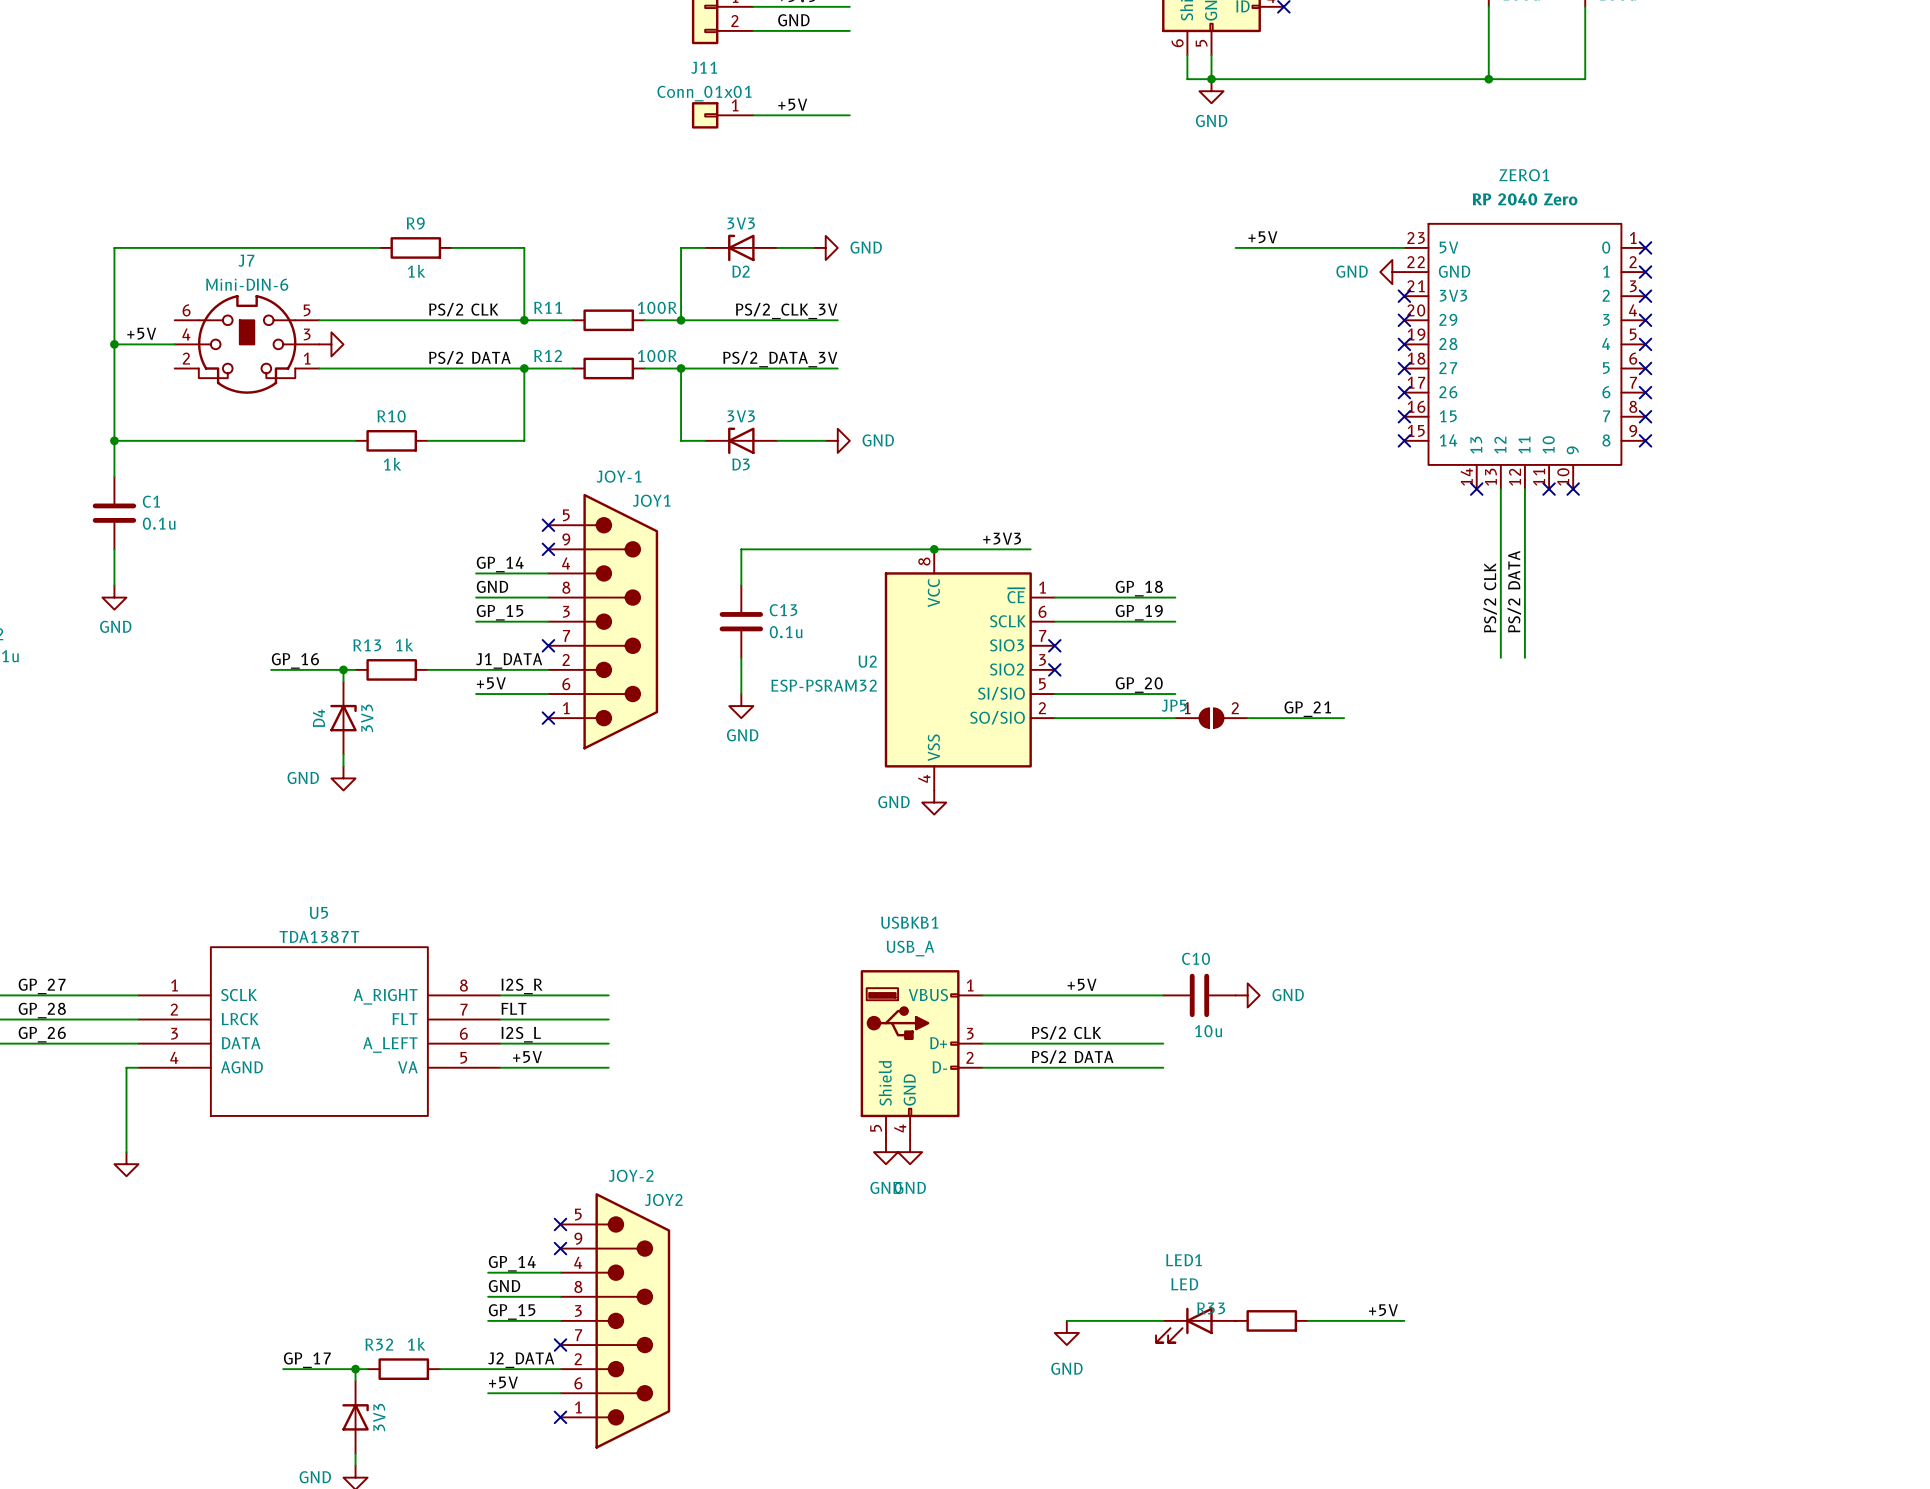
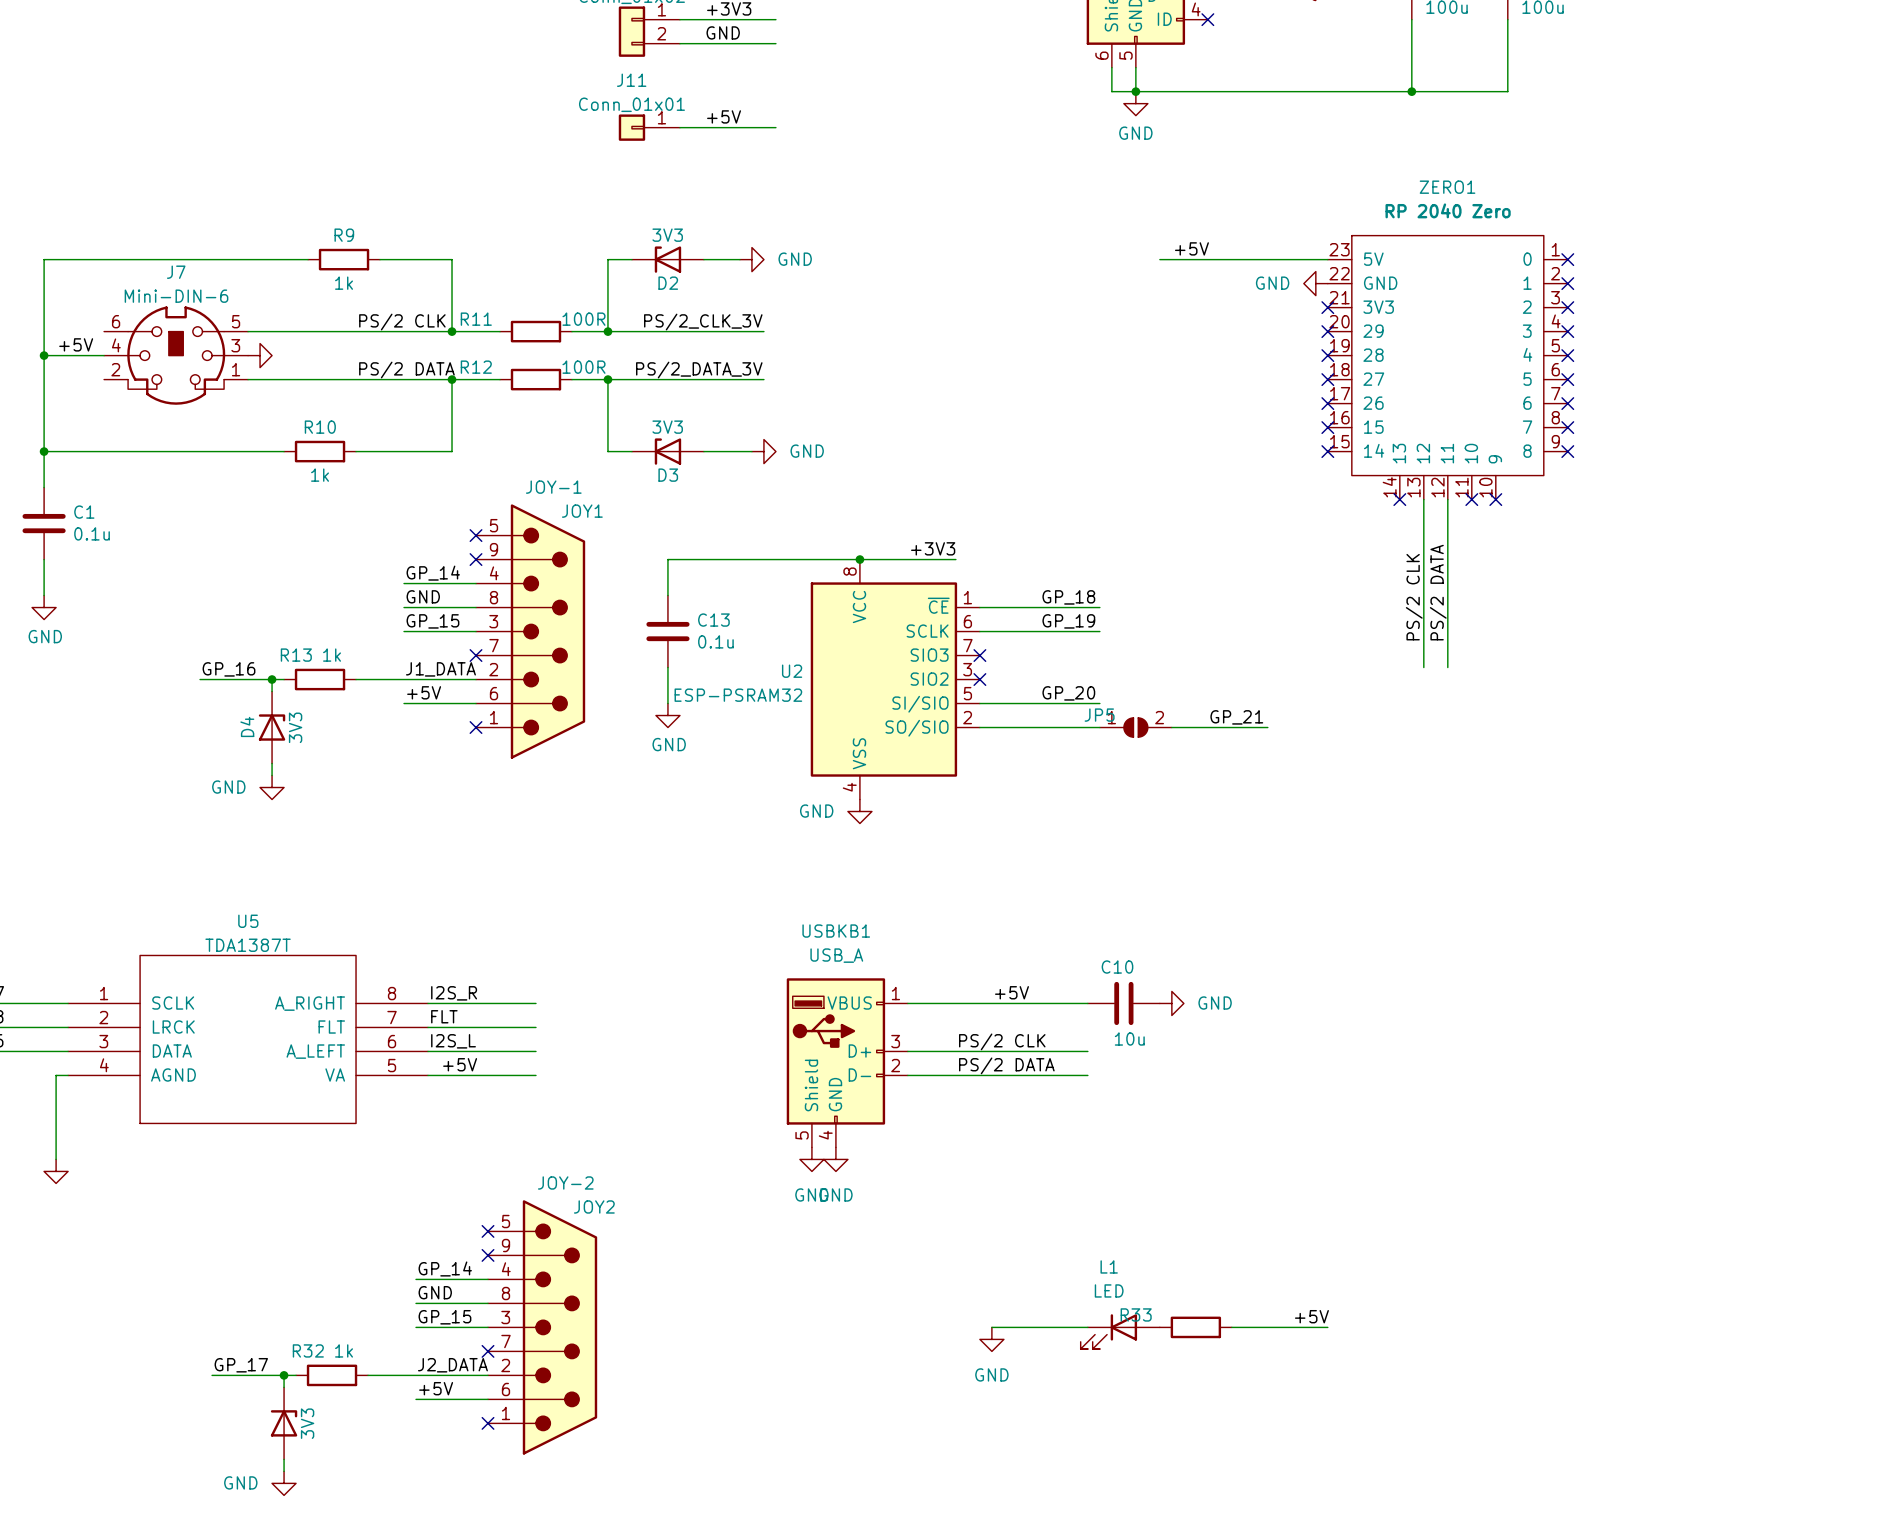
LED1 name: LED1 (1184, 1260) -> L1 (1109, 1266)

